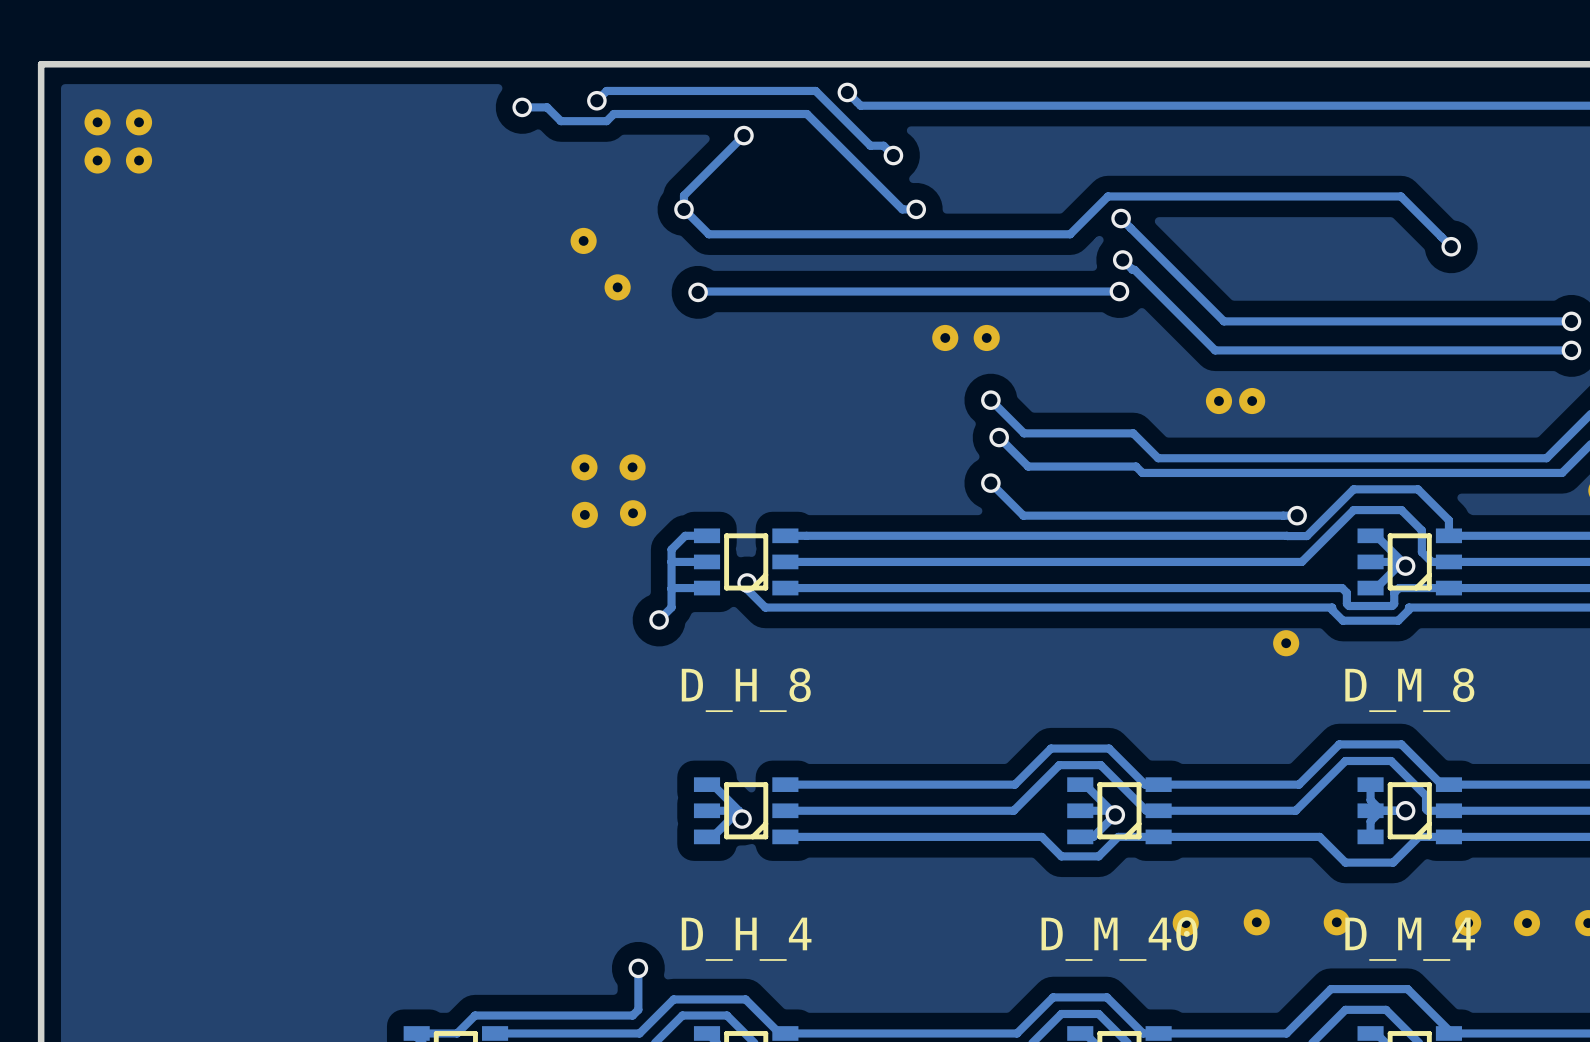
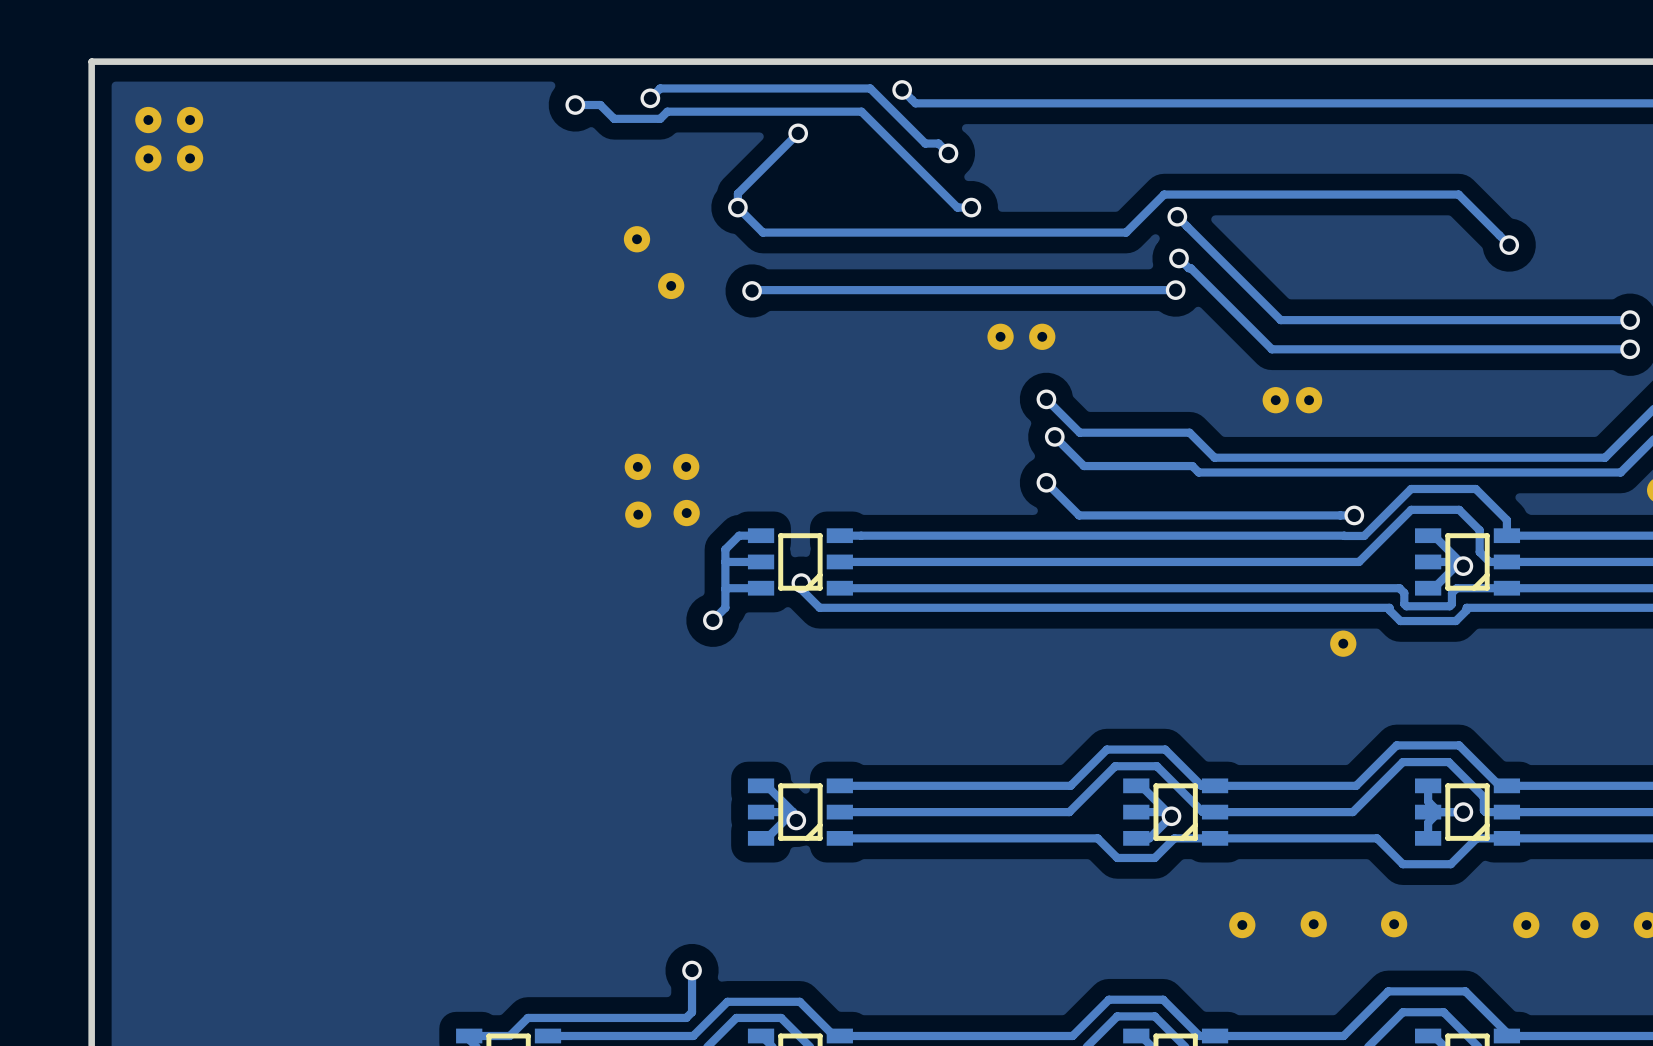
D_H_8 name: D_H_8 (746, 690) -> none
D_M_8 name: D_M_8 (1409, 690) -> none
D_M_40 name: D_M_40 (1119, 938) -> none
D_H_4 name: D_H_4 (746, 939) -> none
D_M_4 name: D_M_4 (1410, 939) -> none

